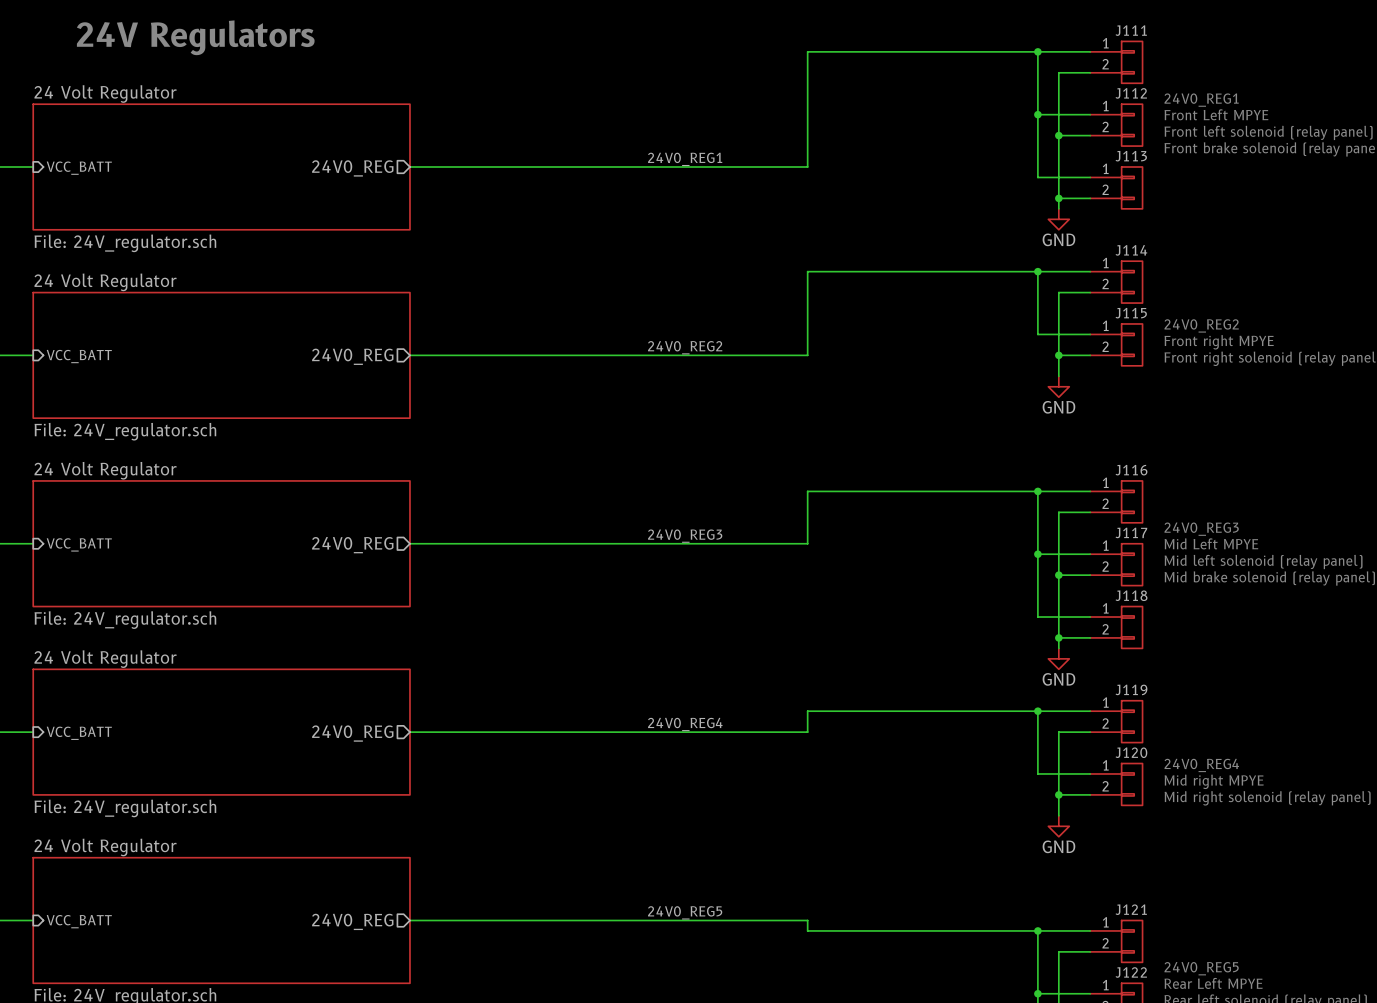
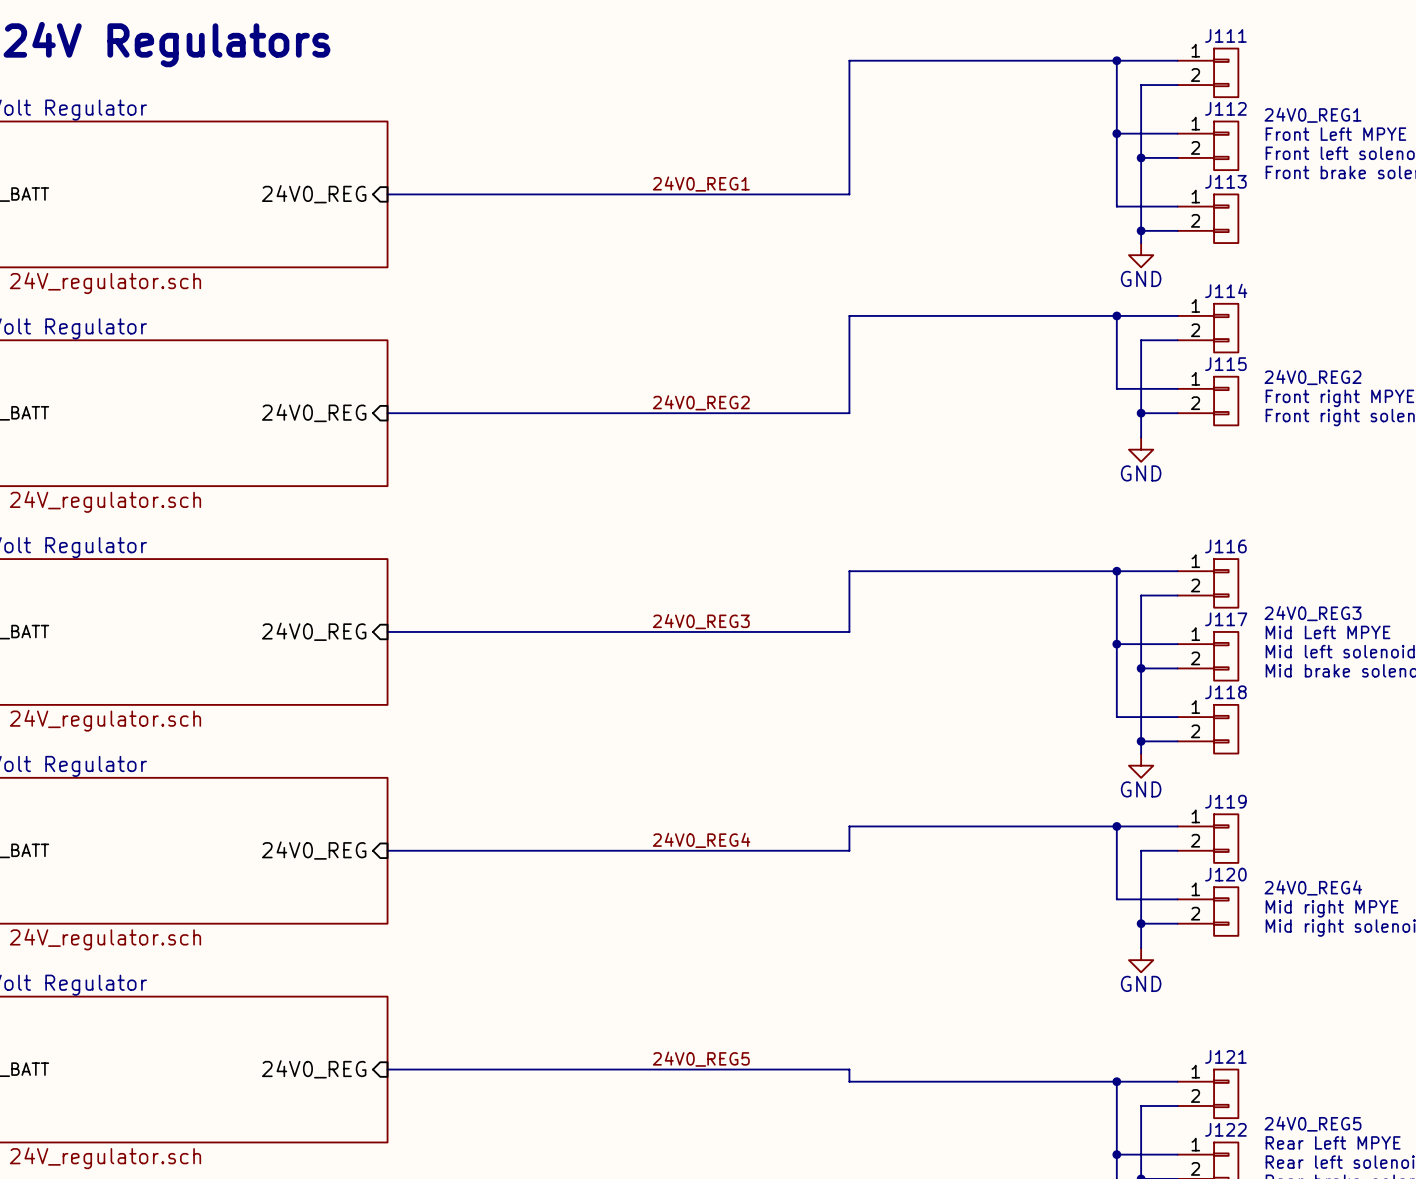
sheet pin shape: output (352, 168) -> input (314, 194)
sheet pin shape: output (352, 356) -> input (314, 413)
sheet pin shape: output (352, 545) -> input (314, 631)
sheet pin shape: output (352, 733) -> input (314, 850)
sheet pin shape: output (352, 921) -> input (314, 1069)

